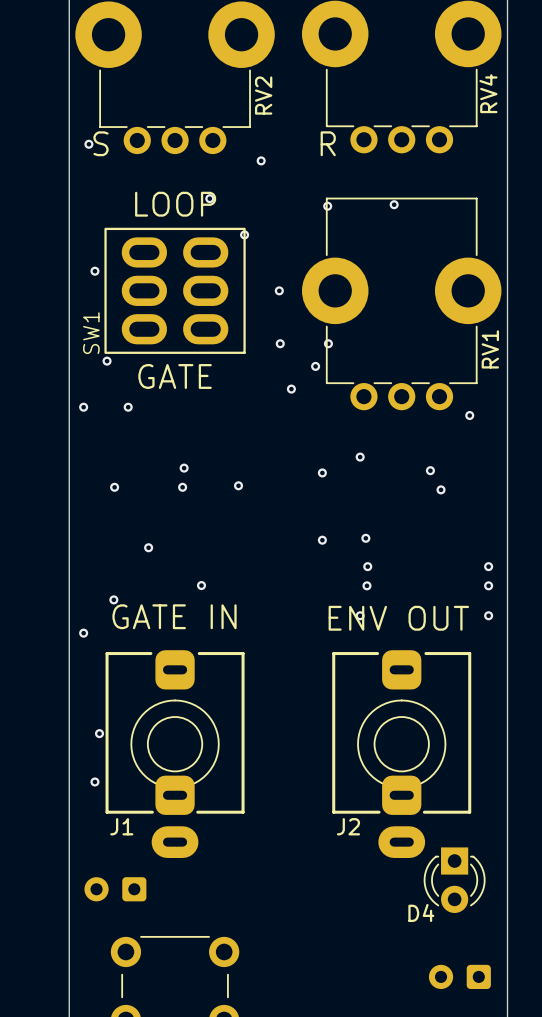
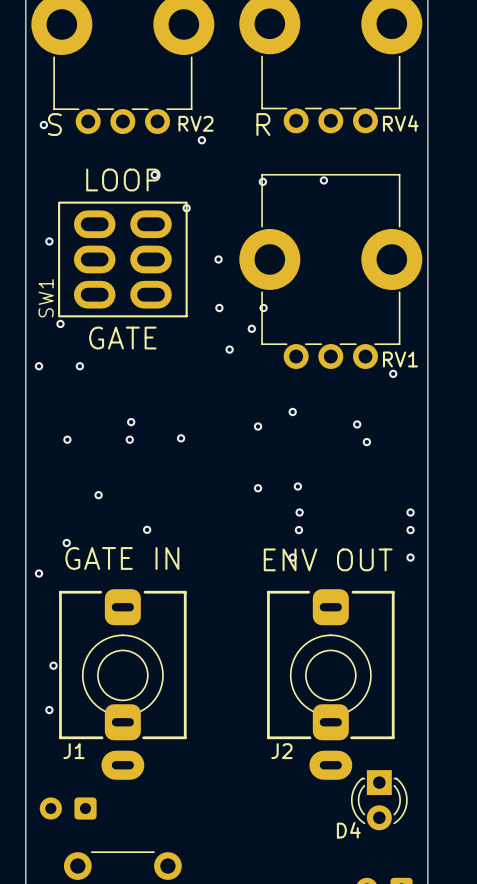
RV4 name rotation: 0° (488, 93) -> 90° clockwise (400, 123)
RV2 name rotation: 0° (263, 95) -> 90° clockwise (195, 123)
RV1 name rotation: 0° (490, 349) -> 90° clockwise (400, 359)

